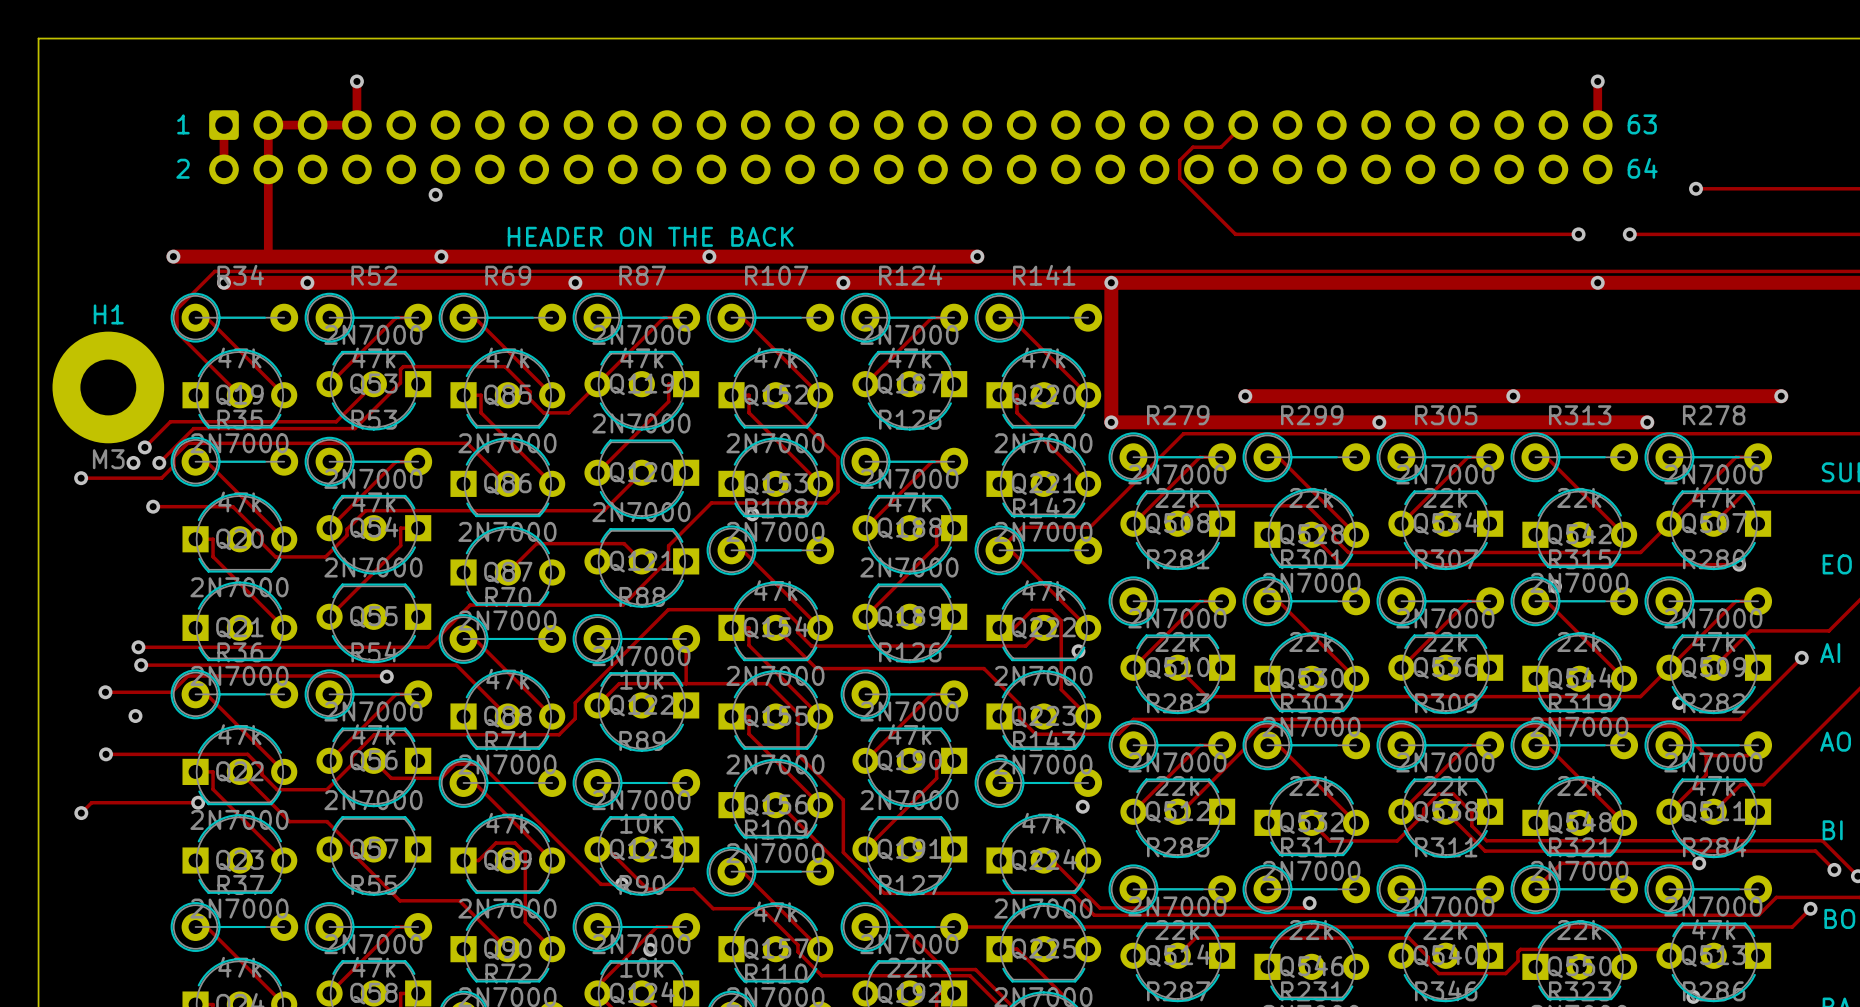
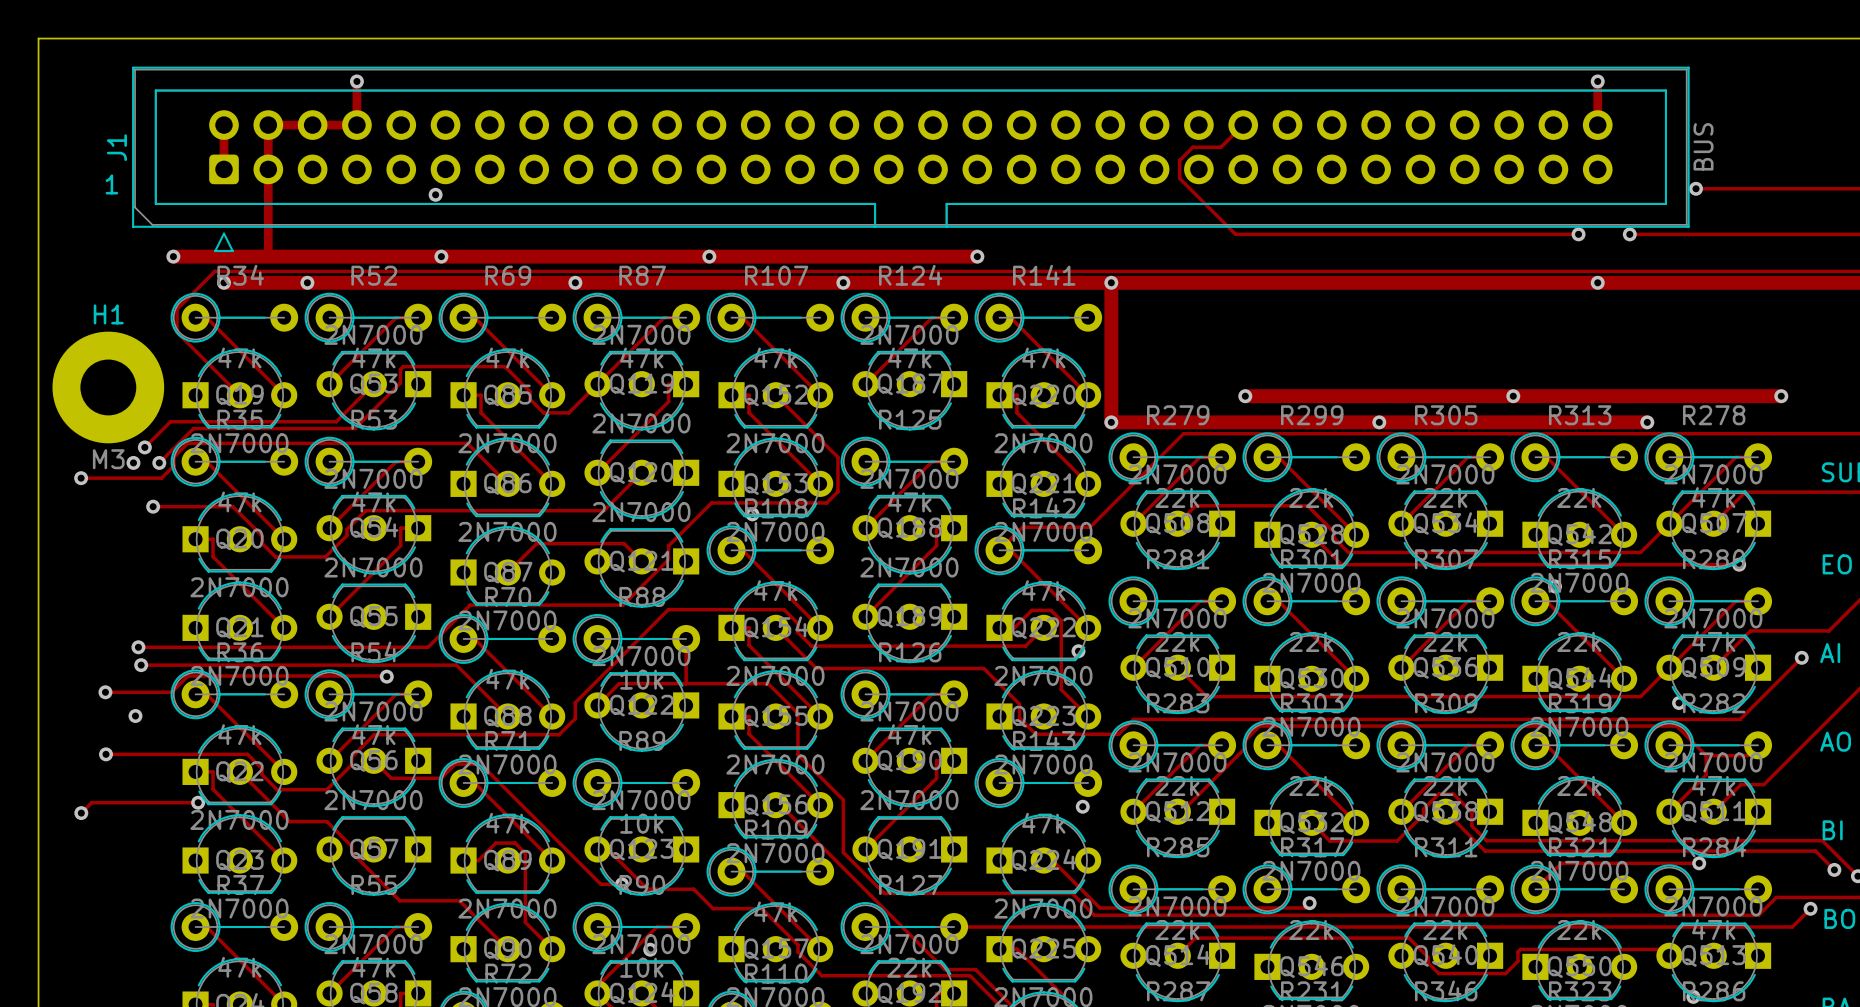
text position: 1 (183, 124) -> 1 (111, 184)
text: 63 (1642, 124) -> none
J1 side: bottom (910, 147) -> top (910, 159)
text: 2 (183, 168) -> none
text: 64 (1642, 168) -> none
text: HEADER ON THE BACK (650, 236) -> none

